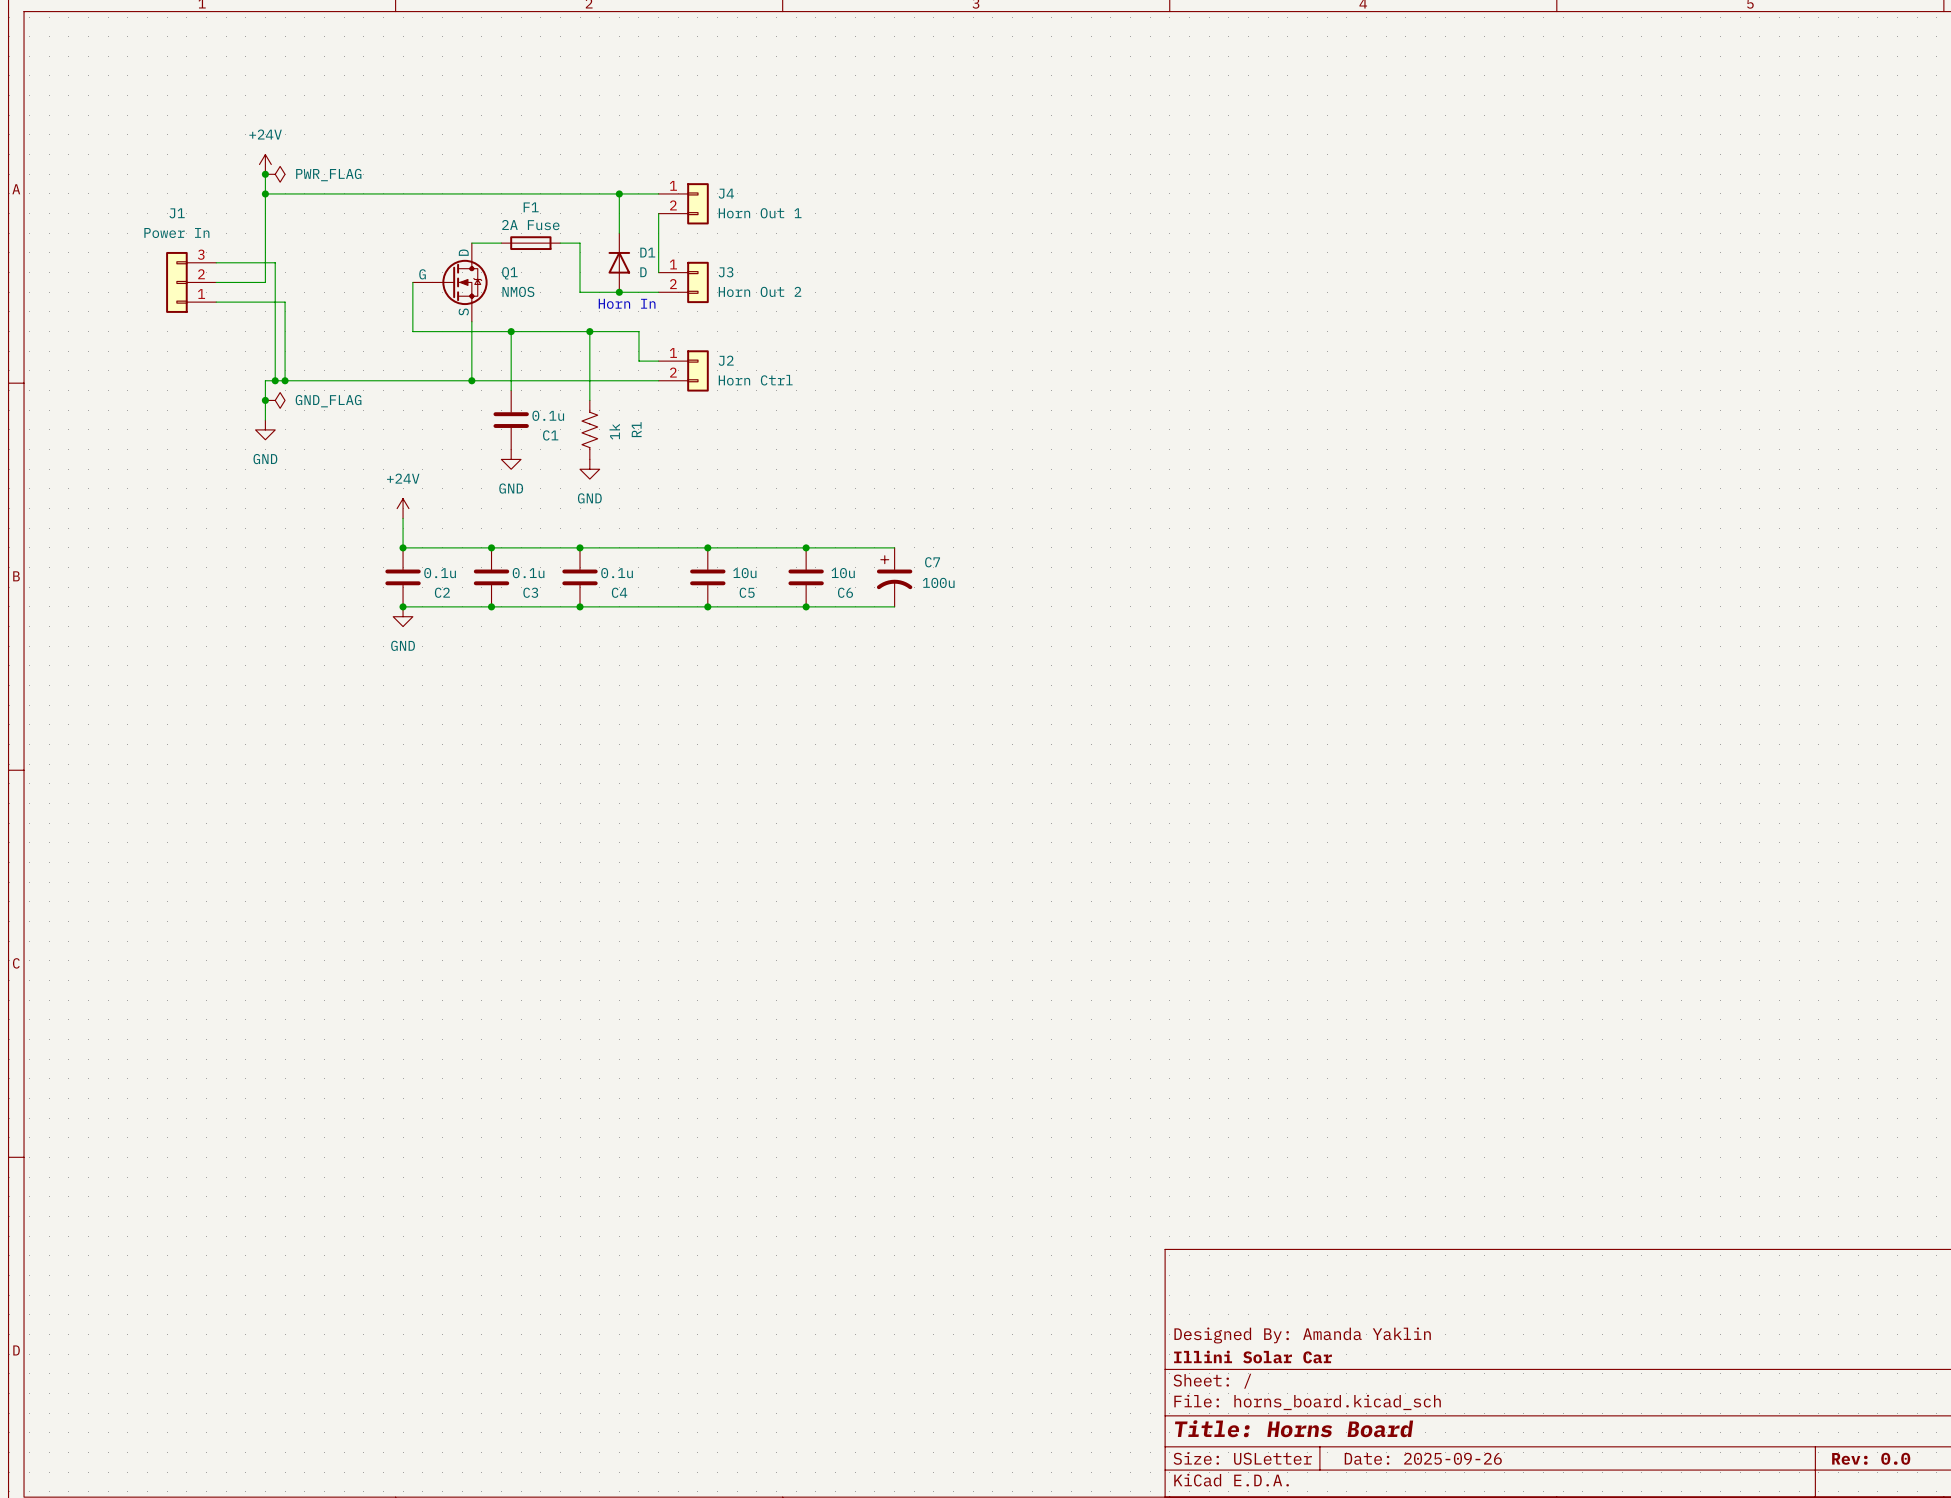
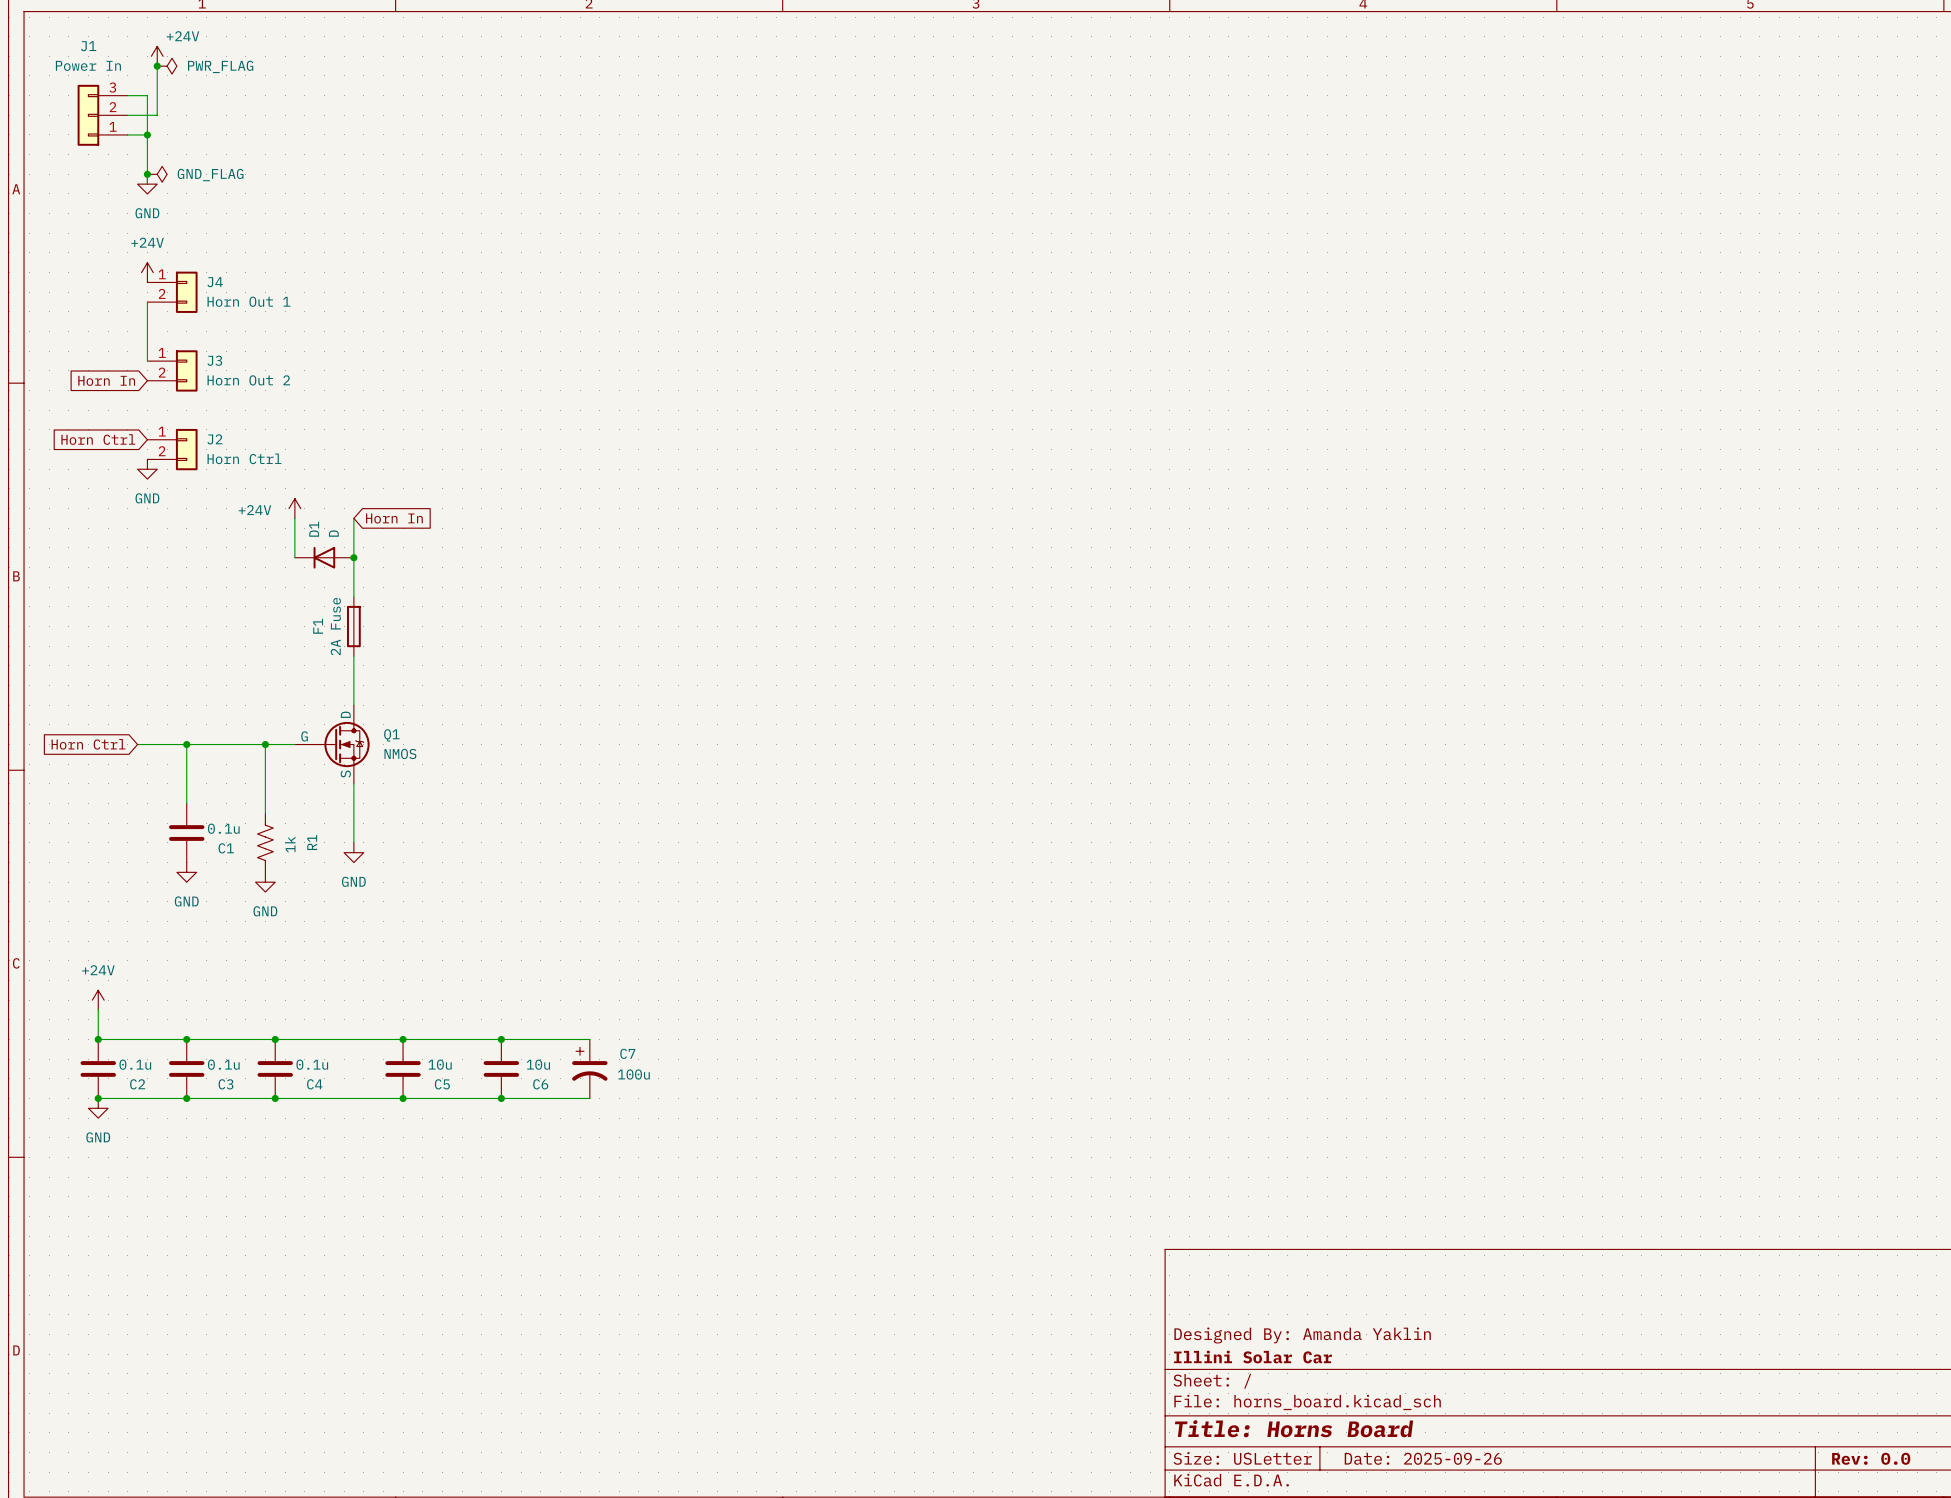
power symbol: none -> +24V (157, 56)
wire: none -> (157, 66) (157, 115) (127, 115)
junction: none -> (157, 66)
wire: none -> (127, 95) (147, 95) (147, 184)
wire: none -> (127, 134) (147, 134)
junction: none -> (147, 134)
power symbol: +24V (265, 164) -> none
junction: none -> (147, 174)
power symbol: none -> GND_FLAG (157, 174)
wire: (265, 174) (265, 282) (216, 282) -> none
junction: (265, 174) -> none
power symbol position: PWR_FLAG (275, 174) -> PWR_FLAG (167, 66)
power symbol: none -> GND (147, 184)
wire: (265, 193) (658, 193) -> none
junction: (265, 193) -> none
wire: (619, 193) (619, 233) -> none
junction: (619, 193) -> none
J4 position: (683, 203) -> (172, 292)
F1 name position: F1 (531, 207) -> F1 (318, 626)
wire: (658, 213) (658, 272) -> none
F1 value position: 2A Fuse (530, 225) -> 2A Fuse (335, 626)
wire: (471, 243) (501, 243) -> none
F1 rotation: 0° (530, 243) -> 90° clockwise (353, 626)
F1 position: (530, 243) -> (353, 626)
wire: (560, 243) (580, 243) (580, 292) (658, 292) -> none
wire: (216, 262) (275, 262) (275, 380) -> none
D1 rotation: 0° (619, 262) -> 90° counterclockwise (324, 557)
D1 position: (619, 262) -> (324, 557)
power symbol: none -> +24V (147, 272)
J1 position: (191, 282) -> (102, 115)
wire: (412, 282) (412, 331) (638, 331) (638, 361) (658, 361) -> none
Q1 position: (450, 282) -> (332, 744)
J3 position: (683, 282) -> (172, 370)
junction: (619, 292) -> none
wire: none -> (147, 302) (147, 361)
wire: (216, 302) (285, 302) (285, 380) -> none
text: Horn In (627, 303) -> none
wire: (471, 321) (471, 380) -> none
wire: (511, 331) (511, 390) -> none
junction: (511, 331) -> none
wire: (589, 331) (589, 400) -> none
junction: (589, 331) -> none
J2 position: (683, 370) -> (172, 449)
global label: none -> Horn In (106, 380)
junction: (275, 380) -> none
junction: (285, 380) -> none
junction: (471, 380) -> none
wire: (658, 380) (265, 380) (265, 420) -> none
junction: (265, 400) -> none
power symbol: GND_FLAG (275, 400) -> none
C1 position: (511, 420) -> (186, 833)
power symbol position: GND (265, 429) -> GND (147, 469)
R1 position: (589, 429) -> (265, 842)
global label: none -> Horn Ctrl (98, 439)
power symbol: GND (511, 459) -> none
power symbol: GND (589, 469) -> none
power symbol text position: +24V (403, 478) -> +24V (254, 510)
power symbol position: +24V (403, 508) -> +24V (294, 508)
wire: none -> (294, 518) (294, 557)
wire: none -> (353, 518) (353, 597)
global label: none -> Horn In (394, 518)
wire: (403, 518) (403, 547) (894, 547) -> none
junction: (403, 547) -> none
junction: (491, 547) -> none
junction: (580, 547) -> none
junction: (707, 547) -> none
junction: (806, 547) -> none
junction: none -> (353, 557)
C2 position: (403, 577) -> (98, 1068)
C3 position: (491, 577) -> (186, 1068)
C4 position: (580, 577) -> (275, 1068)
C5 position: (707, 577) -> (403, 1068)
C6 position: (806, 577) -> (501, 1068)
C7 position: (894, 577) -> (589, 1068)
wire: (403, 606) (894, 606) -> none
junction: (403, 606) -> none
junction: (491, 606) -> none
junction: (580, 606) -> none
junction: (707, 606) -> none
junction: (806, 606) -> none
power symbol: GND (403, 616) -> none
wire: none -> (353, 656) (353, 705)
global label: none -> Horn Ctrl (88, 744)
wire: none -> (137, 744) (294, 744)
wire: none -> (186, 744) (186, 803)
junction: none -> (186, 744)
wire: none -> (265, 744) (265, 813)
junction: none -> (265, 744)
wire: none -> (353, 783) (353, 842)
power symbol: none -> GND (353, 852)
power symbol: none -> GND (186, 872)
power symbol: none -> GND (265, 882)
power symbol: none -> +24V (98, 1000)
wire: none -> (98, 1009) (98, 1039) (589, 1039)
junction: none -> (98, 1039)
junction: none -> (186, 1039)
junction: none -> (275, 1039)
junction: none -> (403, 1039)
junction: none -> (501, 1039)
wire: none -> (98, 1098) (589, 1098)
junction: none -> (98, 1098)
junction: none -> (186, 1098)
junction: none -> (275, 1098)
junction: none -> (403, 1098)
junction: none -> (501, 1098)
power symbol: none -> GND (98, 1108)

